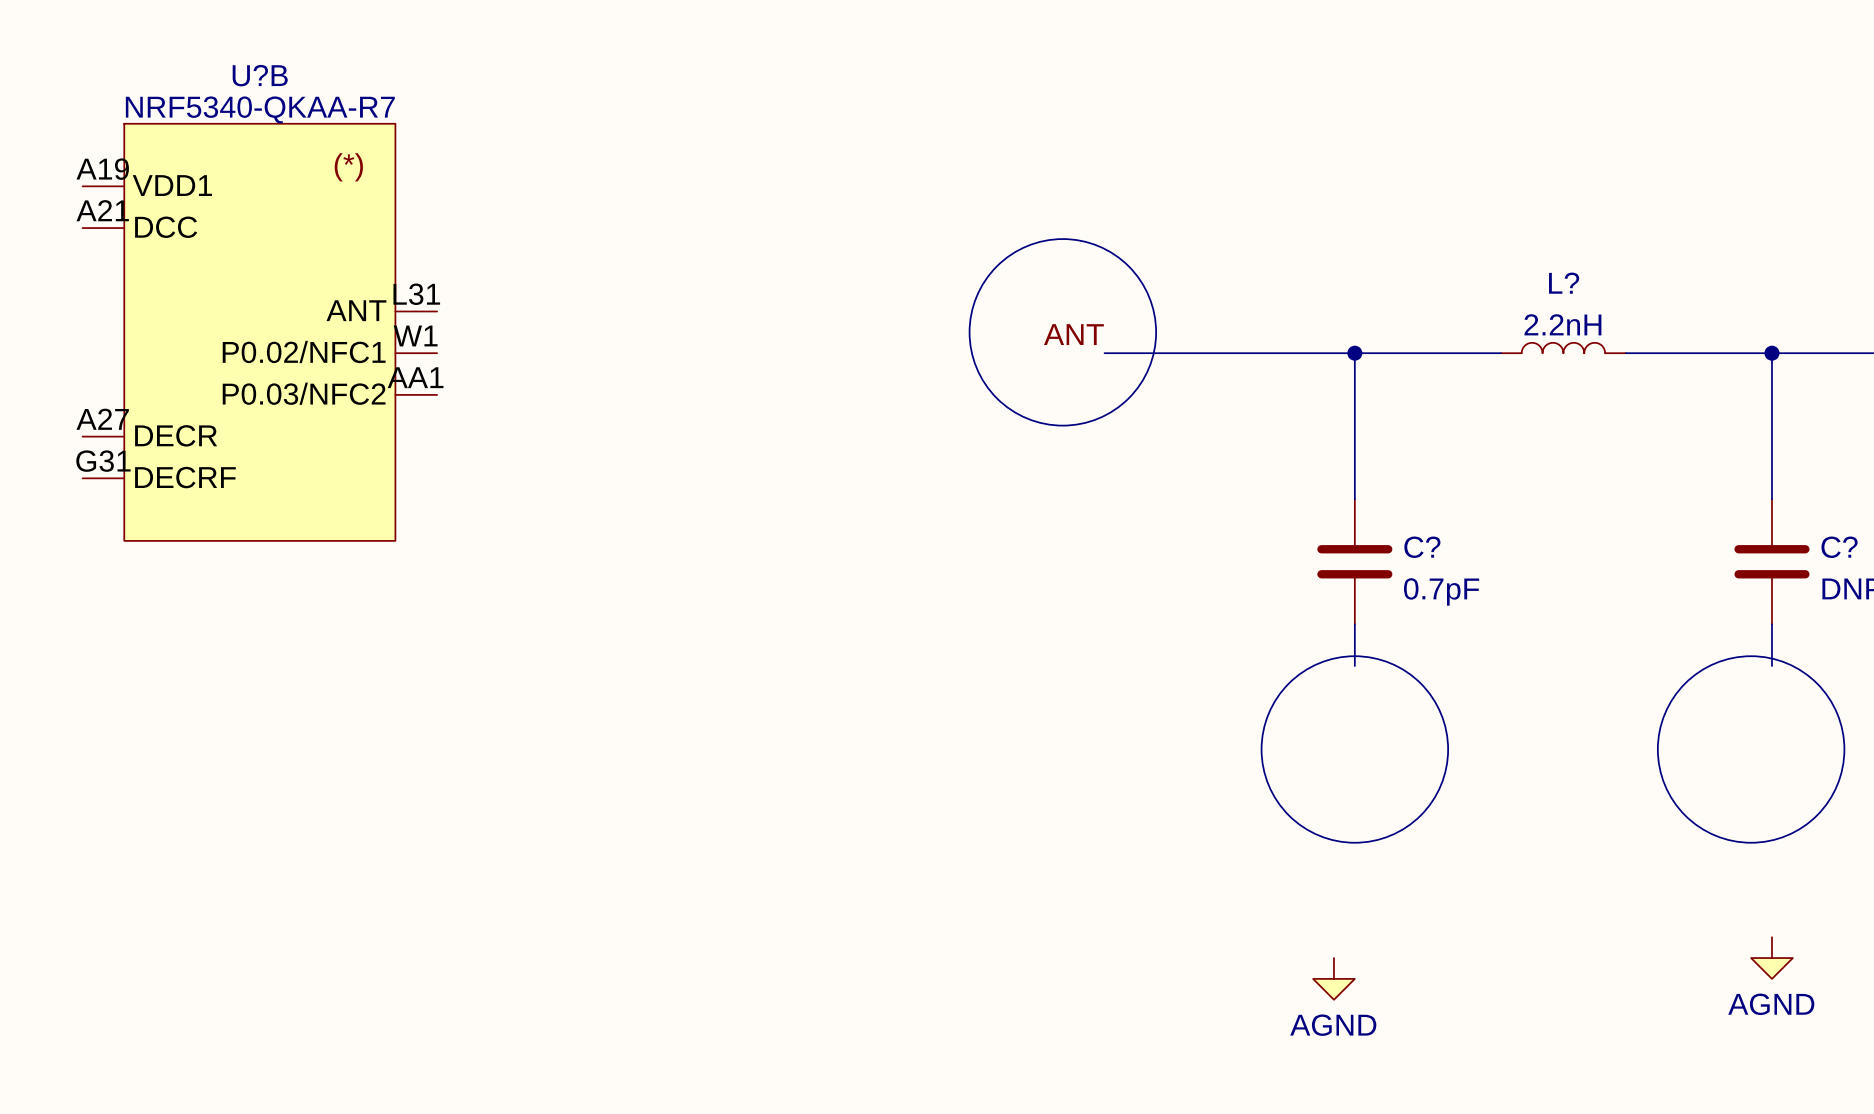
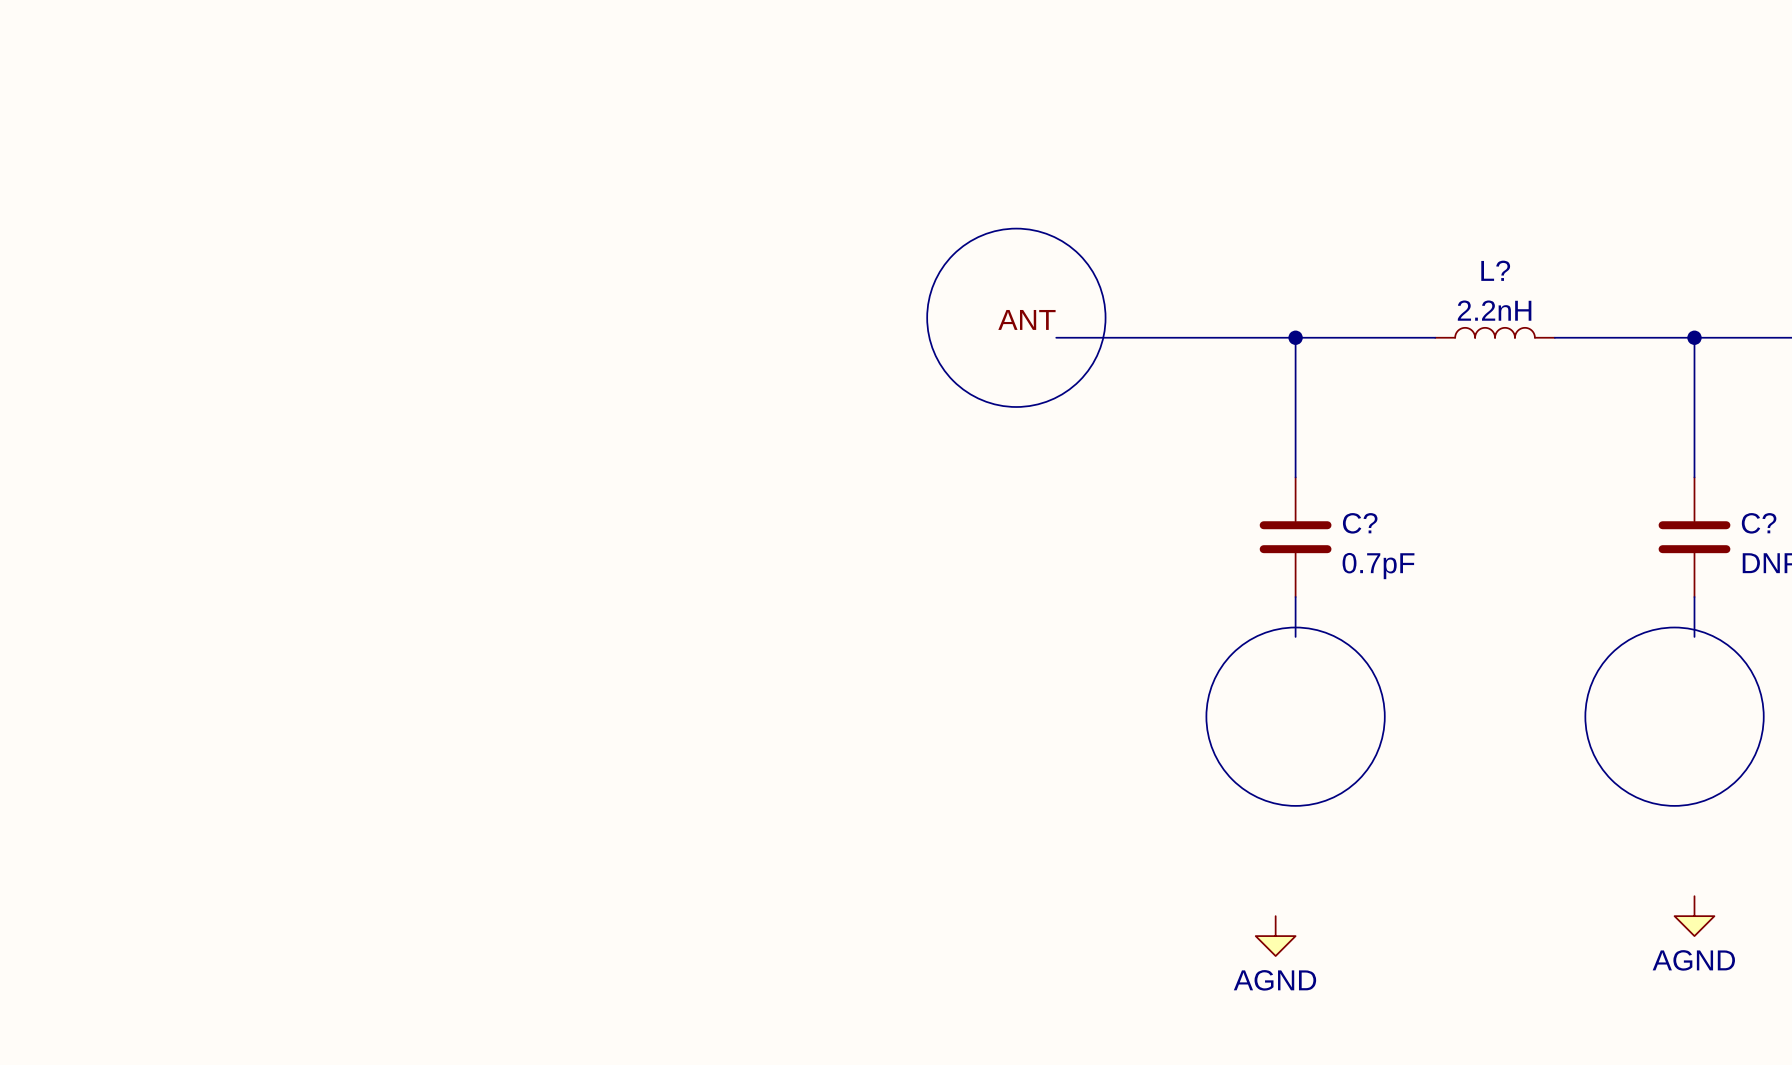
U?B: NRF5340-QKAA-R7 (259, 332) -> none

